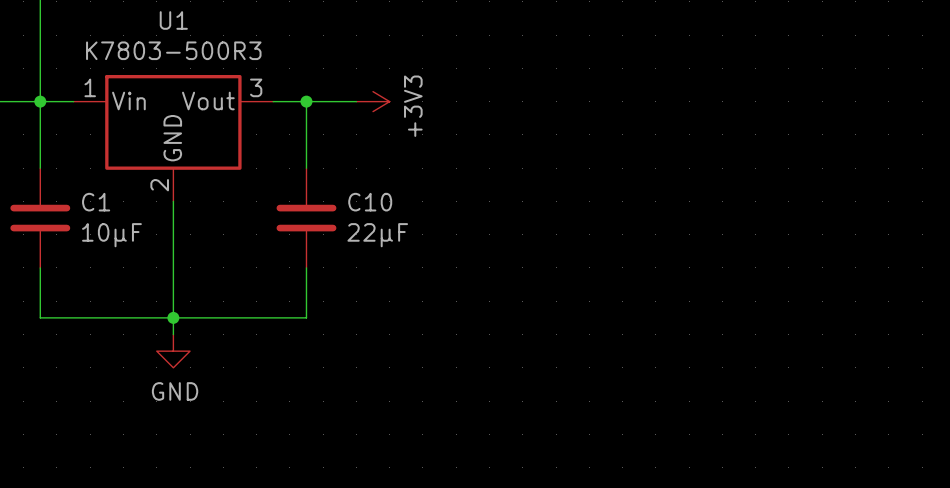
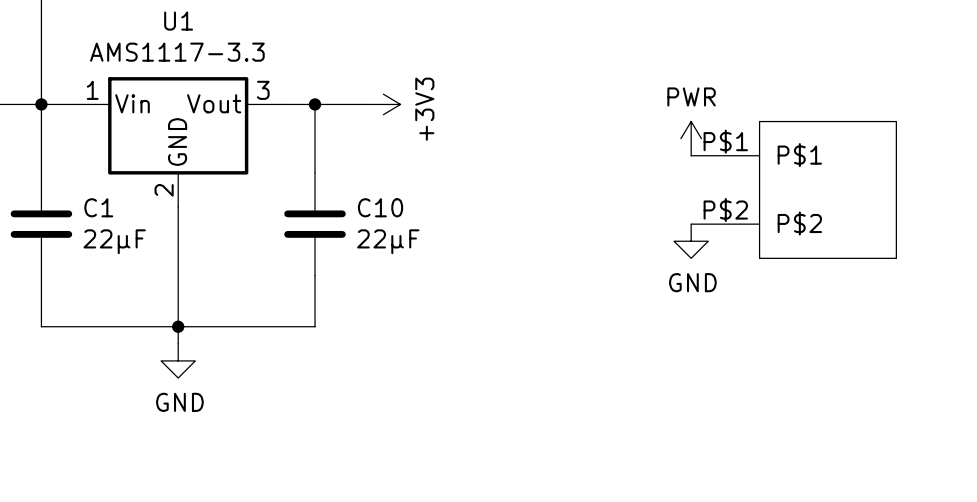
U1 value: K7803-500R3 (173, 50) -> AMS1117-3.3 (177, 52)
power symbol: none -> PWR (691, 138)
part: none -> (793, 189)
power symbol: none -> GND (691, 241)
C1 value: 10μF (111, 235) -> 22μF (114, 241)

